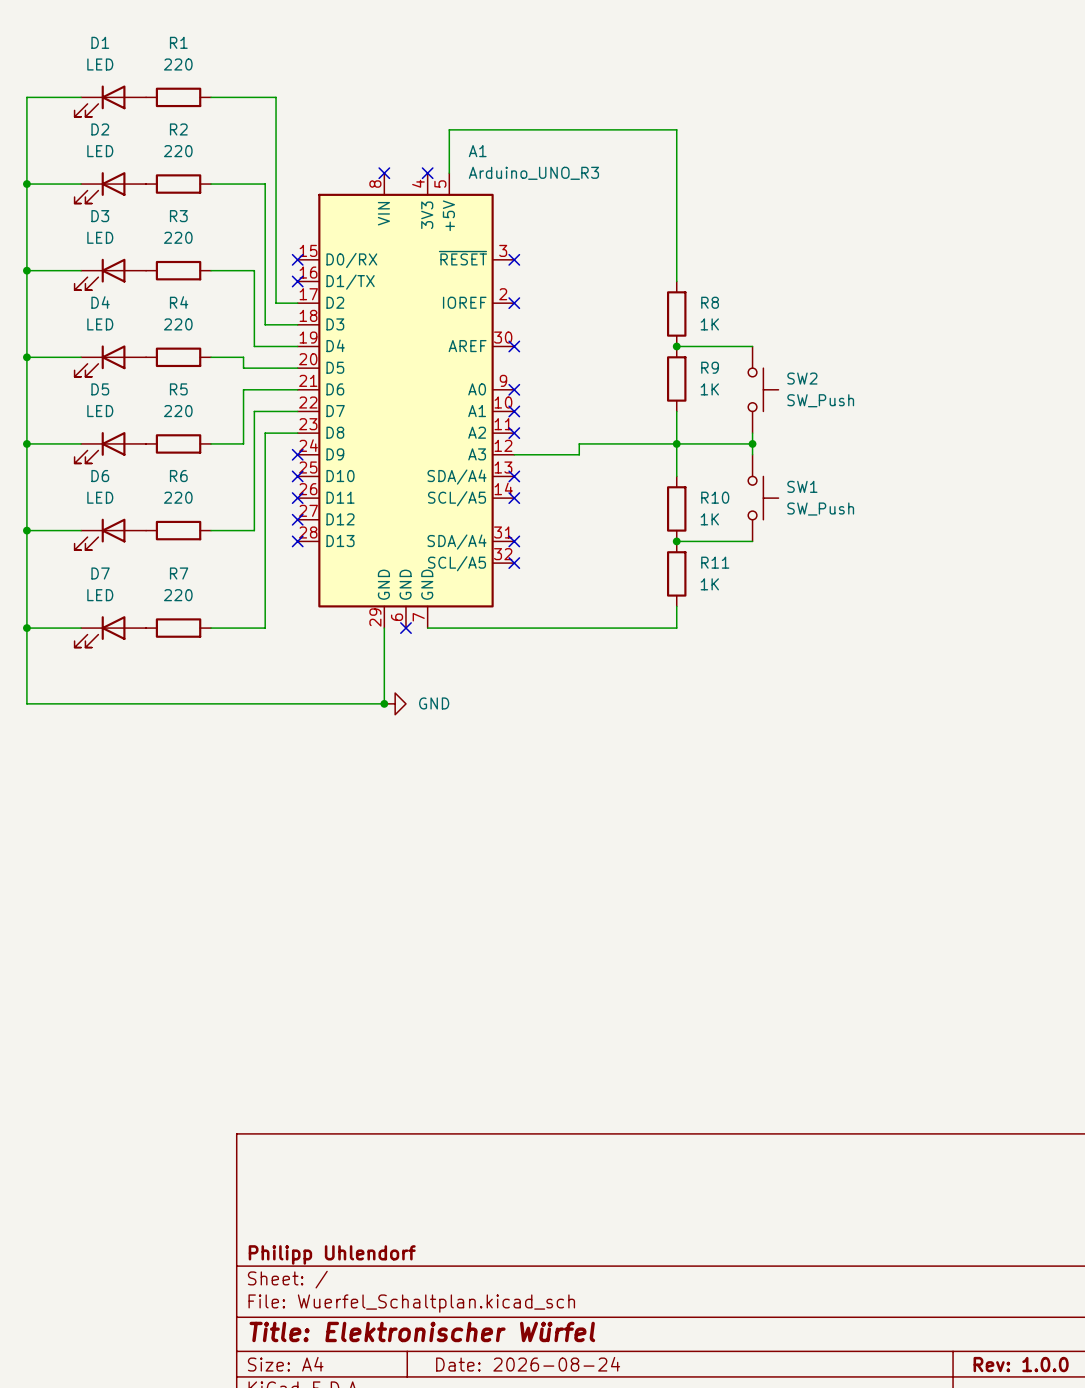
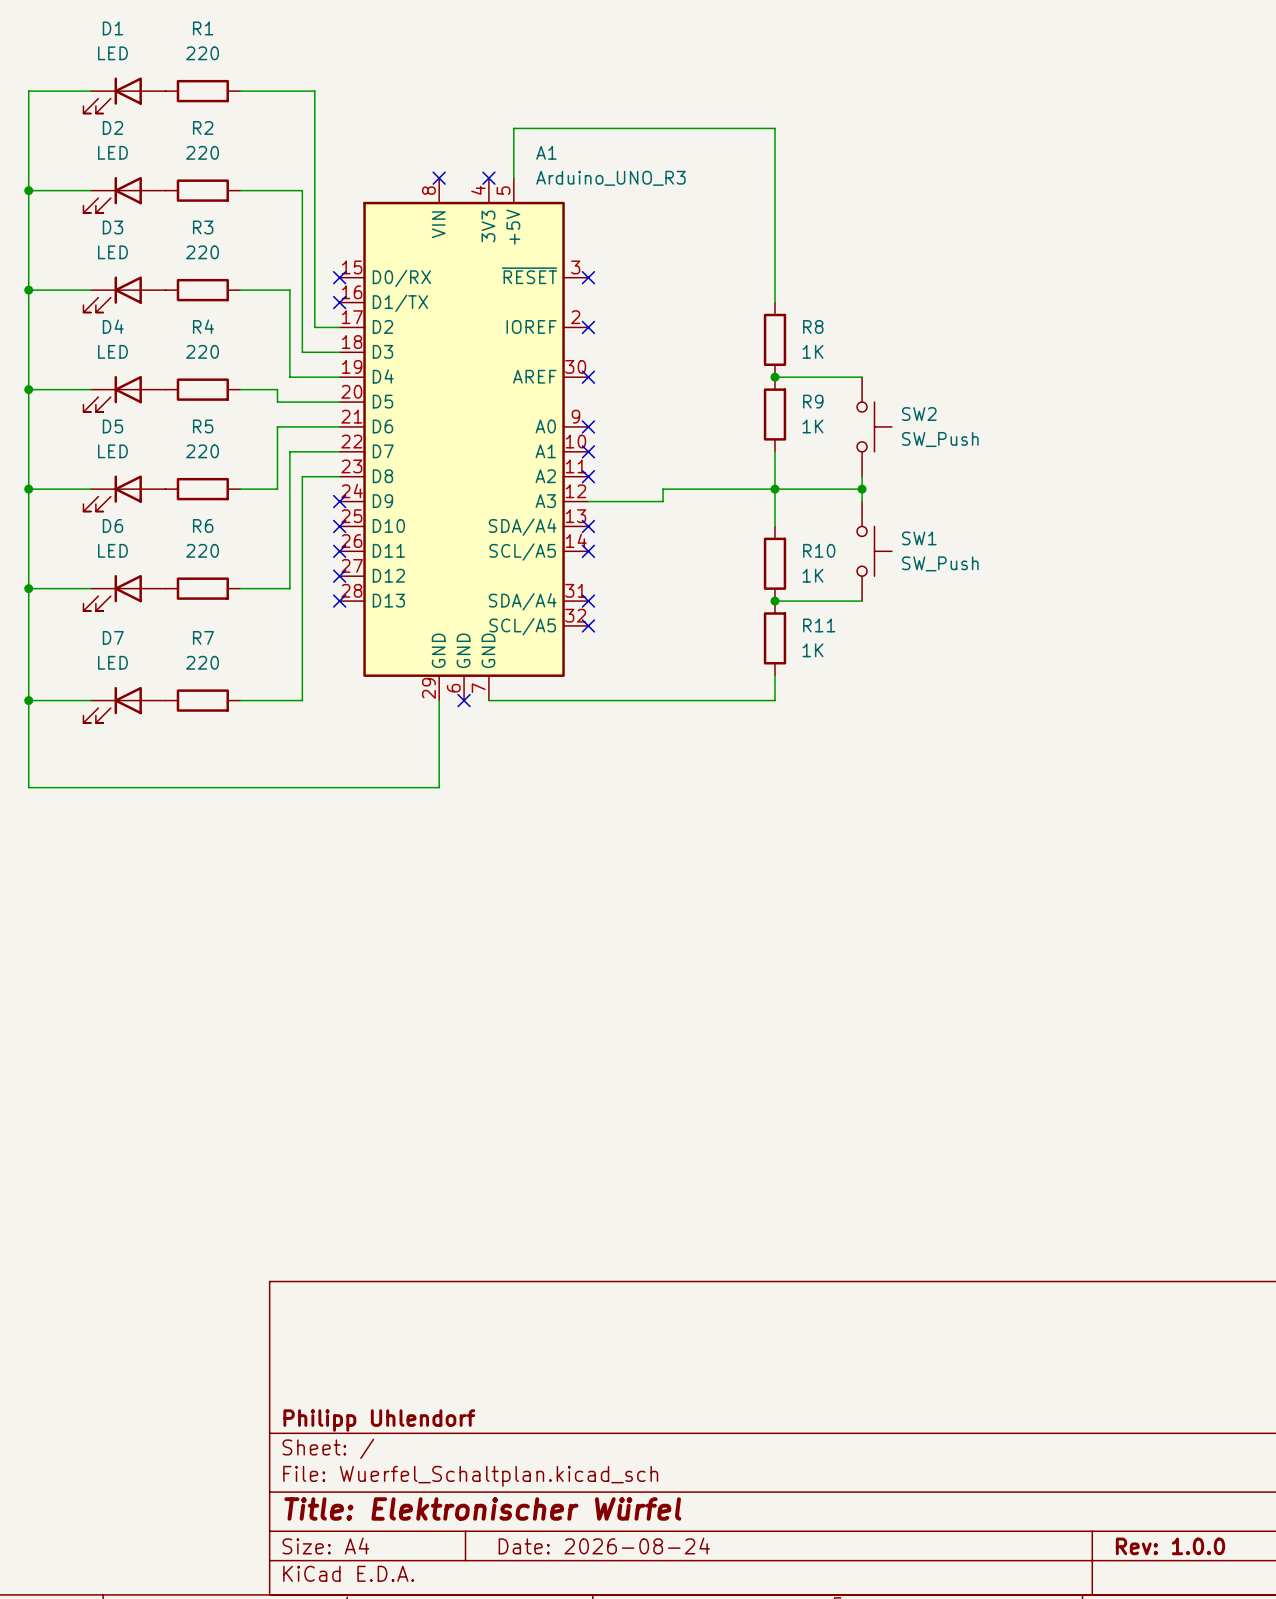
junction: (384, 703) -> none
power symbol: GND (395, 703) -> none

